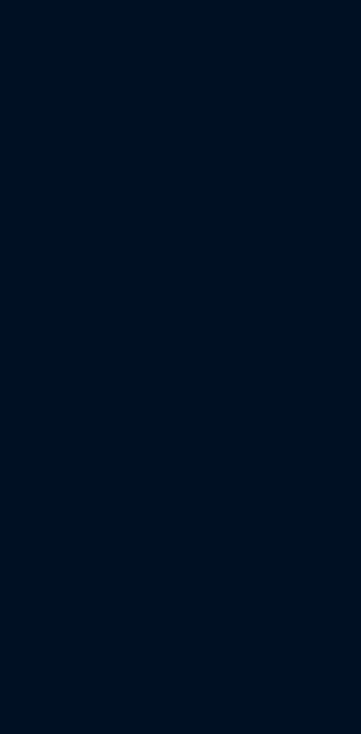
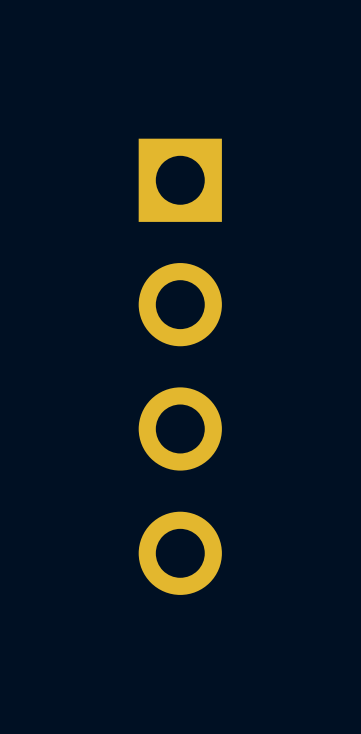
part: none -> (180, 366)

